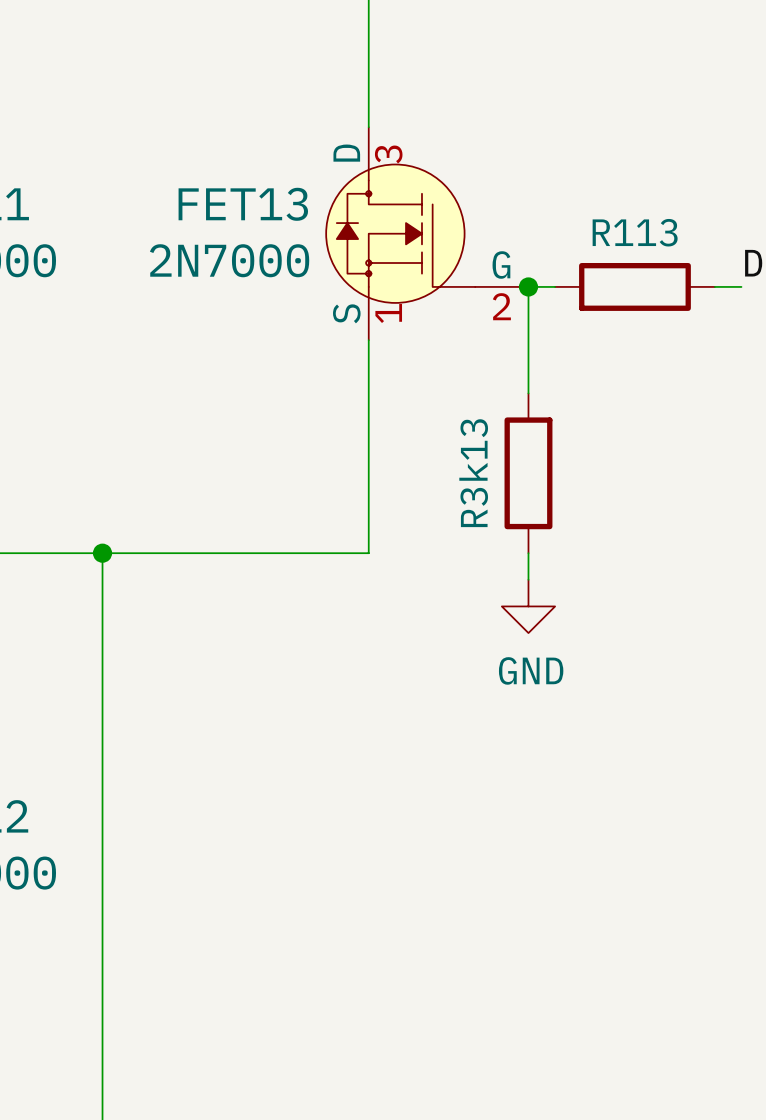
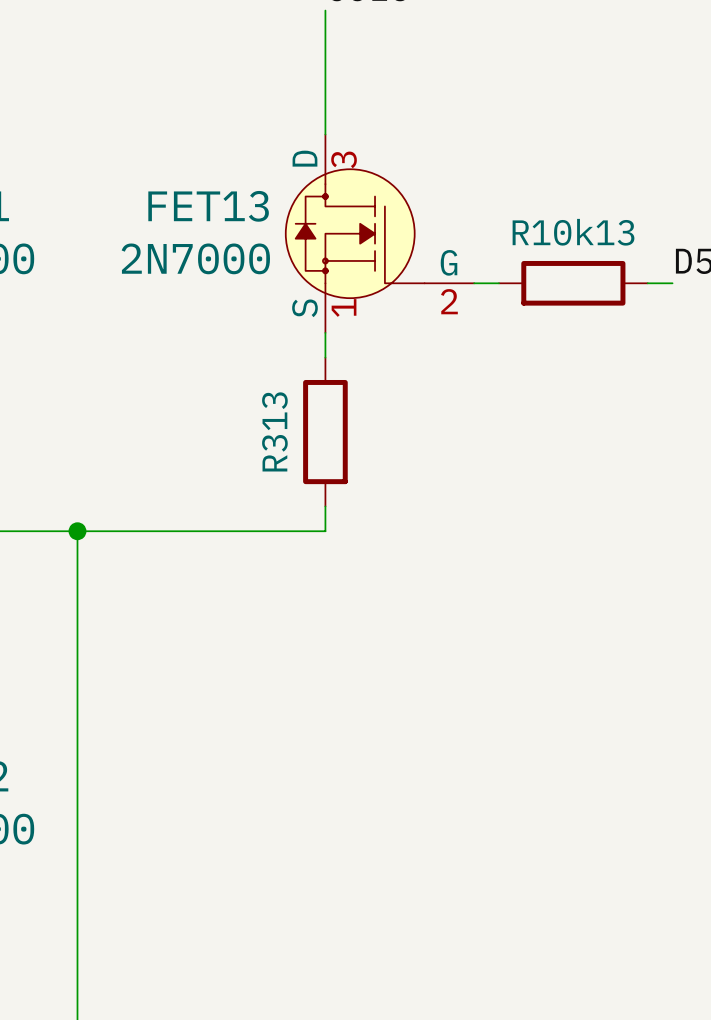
R113 name: R113 (635, 232) -> R10k13 (573, 232)
wire: (528, 286) (528, 393) -> none
junction: (528, 286) -> none
wire: (368, 366) (368, 526) -> none
R313: none -> (325, 432)
R3k13: (528, 473) -> none
wire: (528, 553) (528, 579) -> none
power symbol: GND (528, 606) -> none

